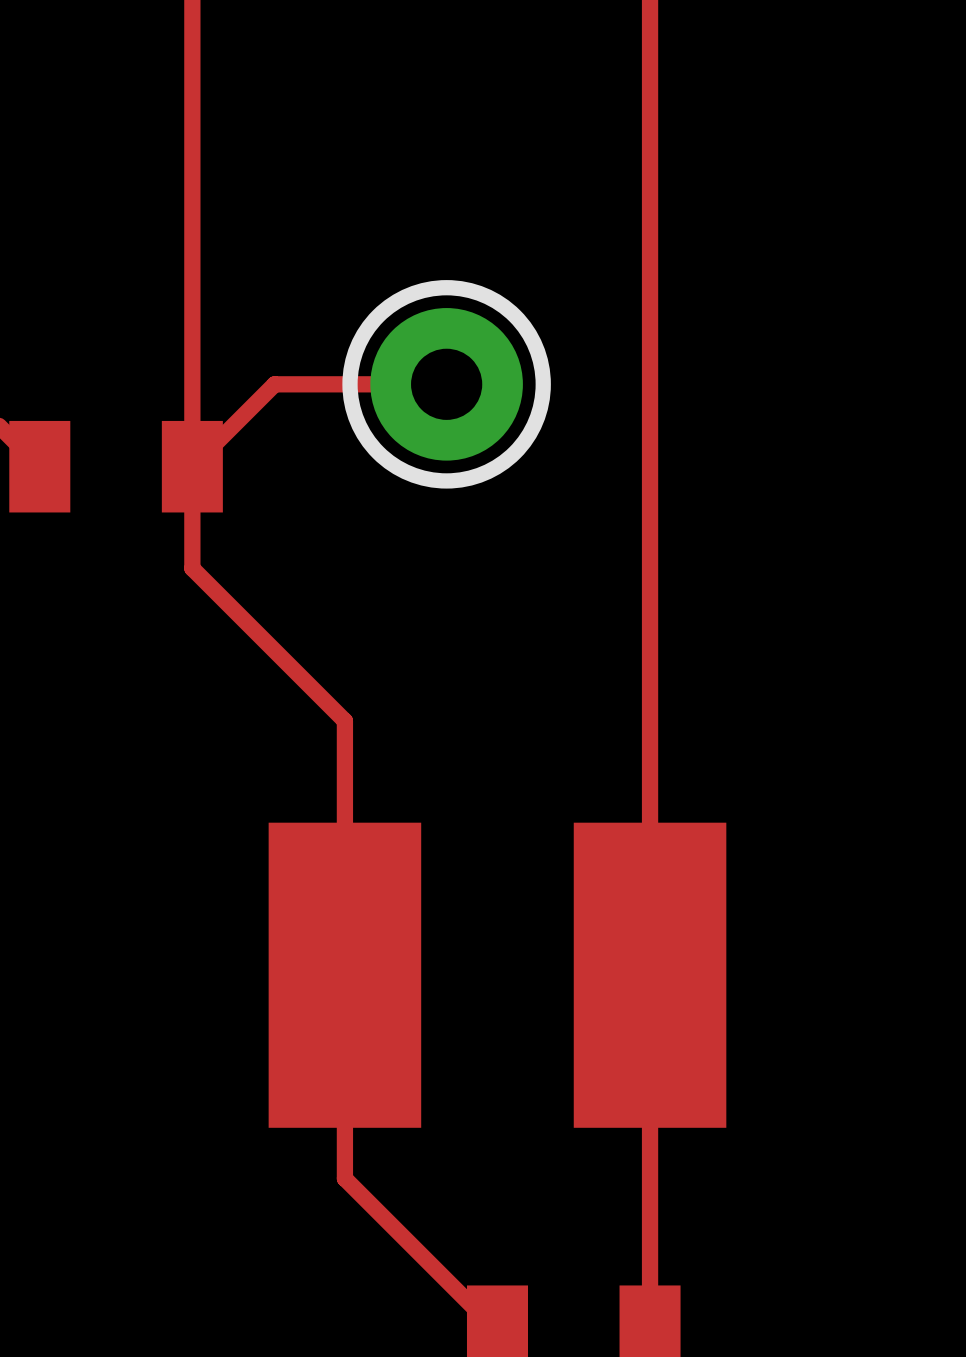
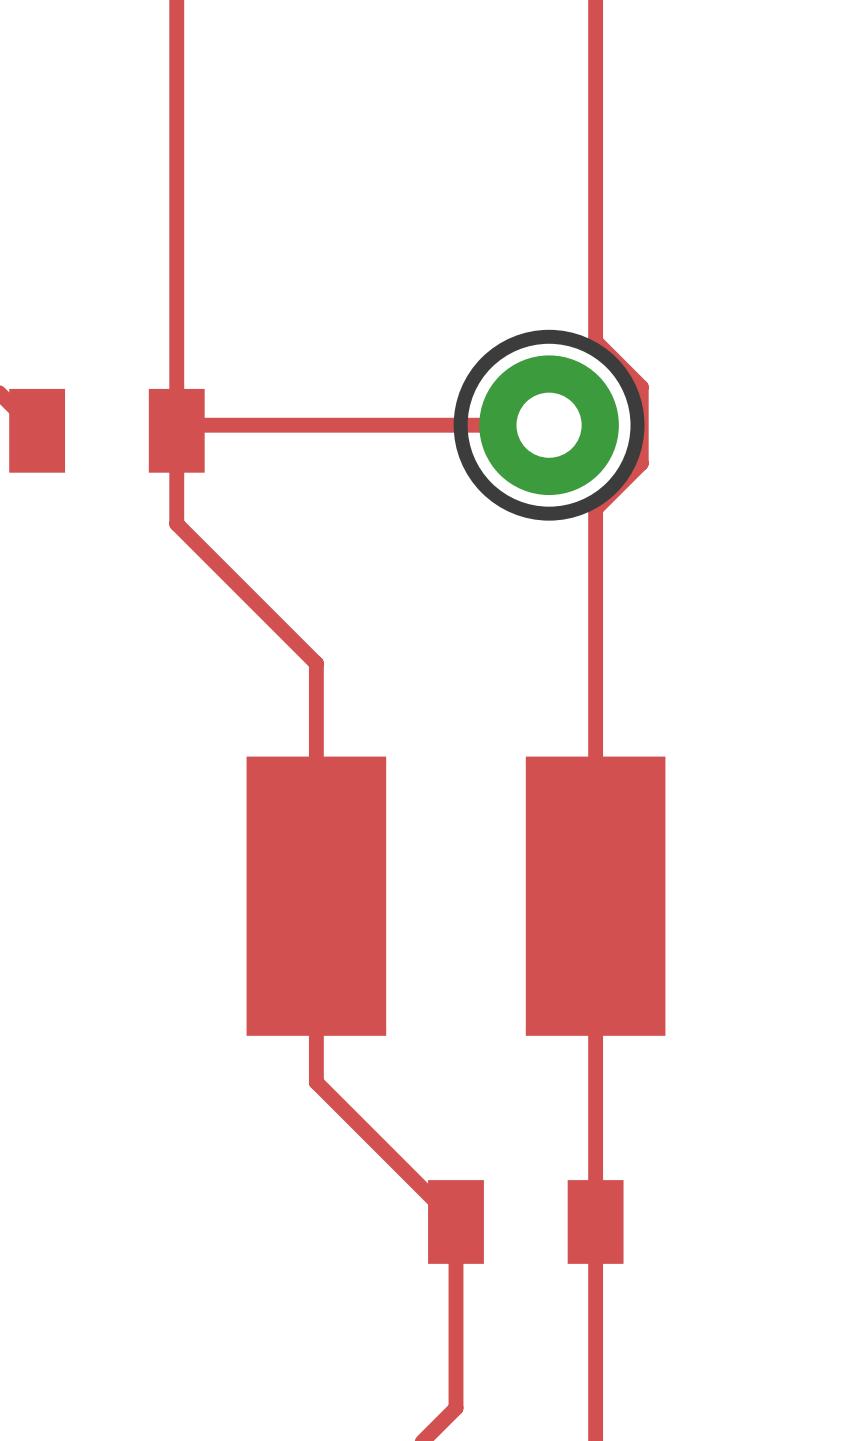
top track: (650, 369) (650, 552) -> (595, 341) (641, 387) (641, 463) (595, 509)
top track: (446, 384) (274, 384) (198, 460) -> (549, 425) (182, 425)
part position: (446, 384) -> (549, 425)

